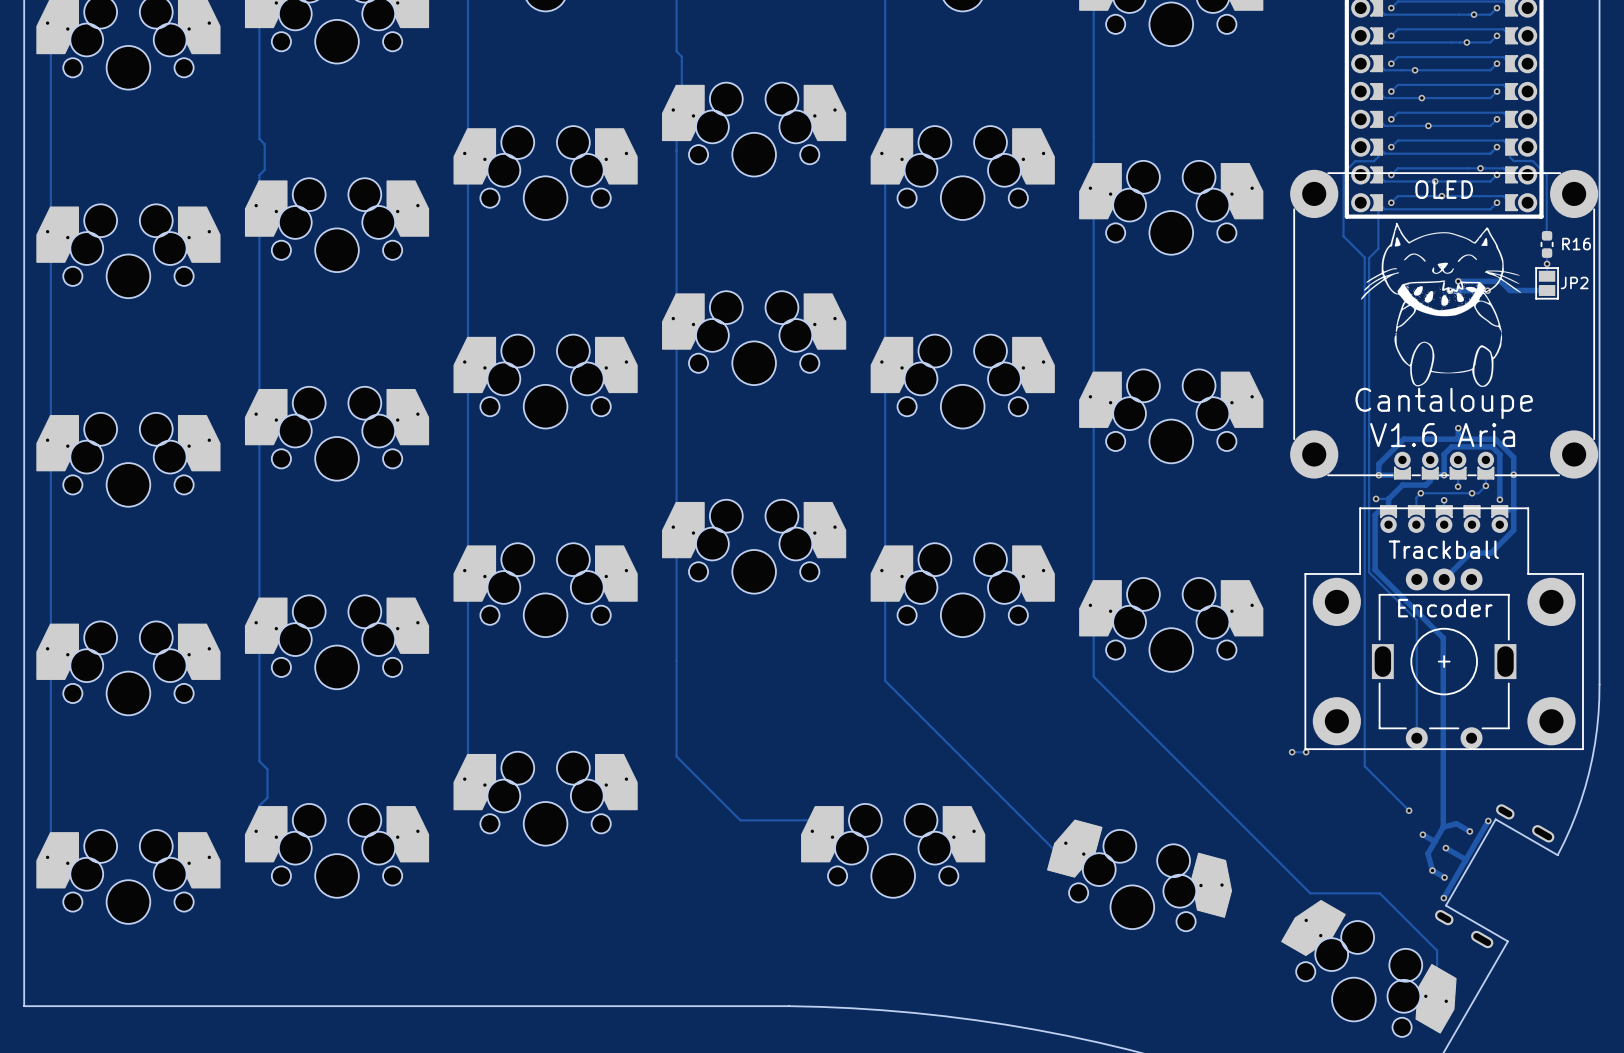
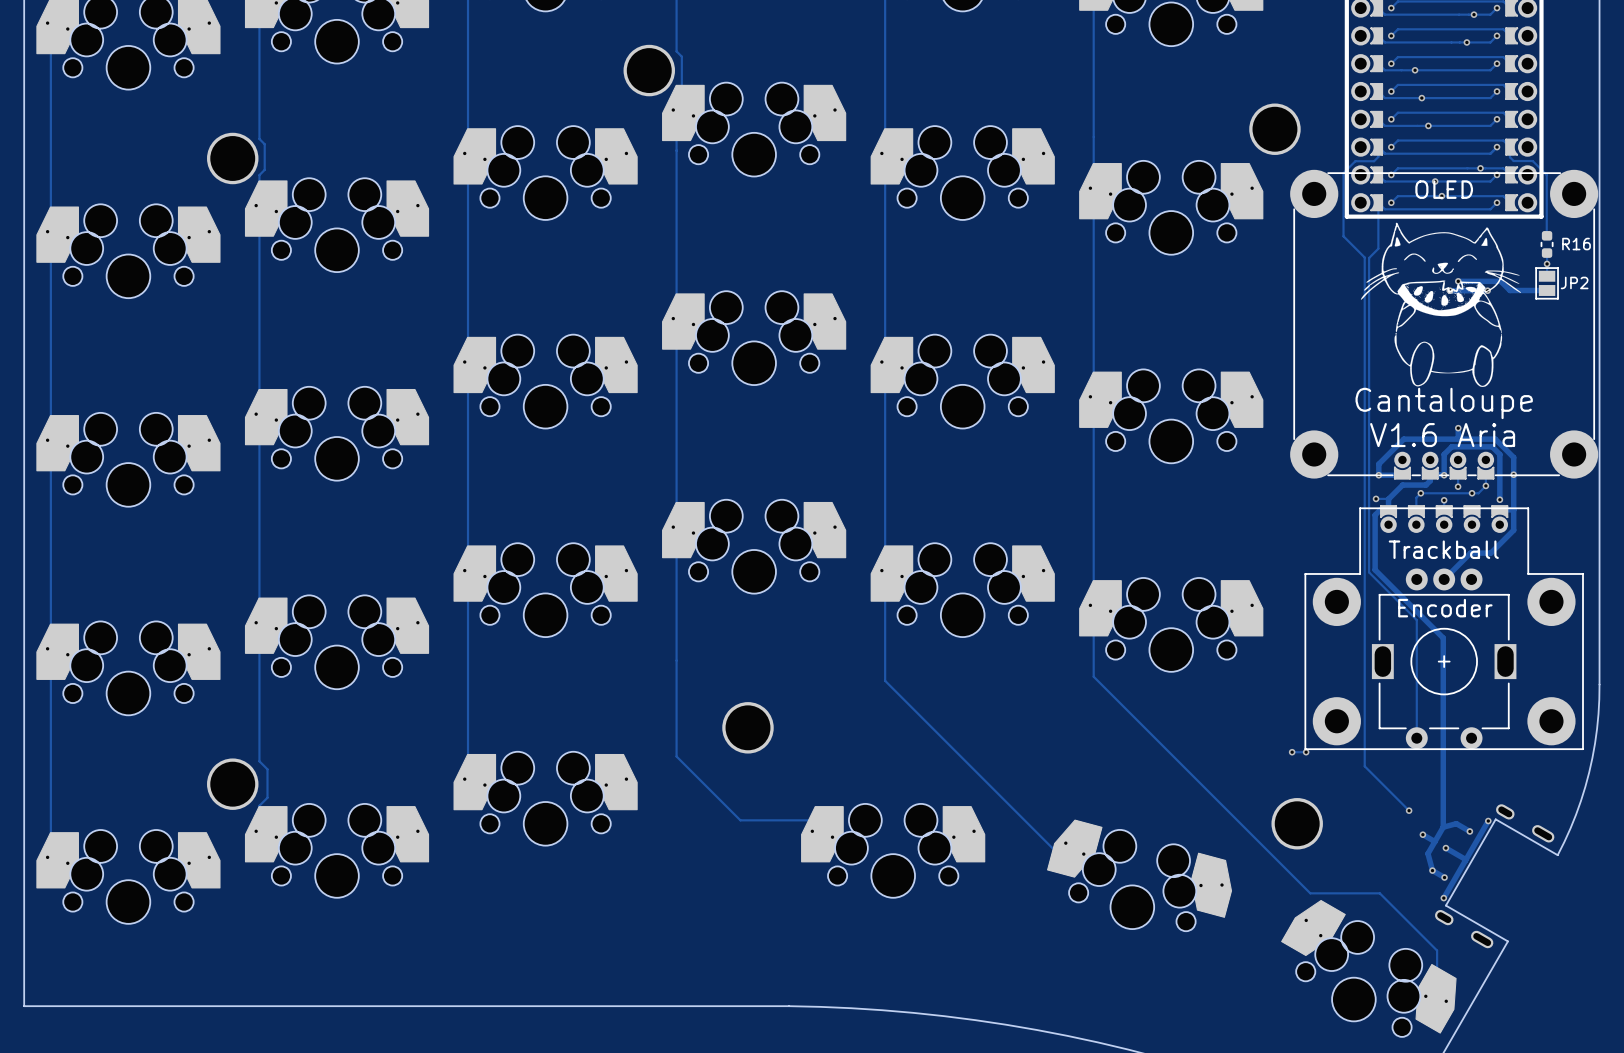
part: none -> (649, 70)
part: none -> (1274, 129)
part: none -> (232, 158)
part: none -> (747, 727)
part: none -> (232, 784)
part: none -> (1297, 823)

